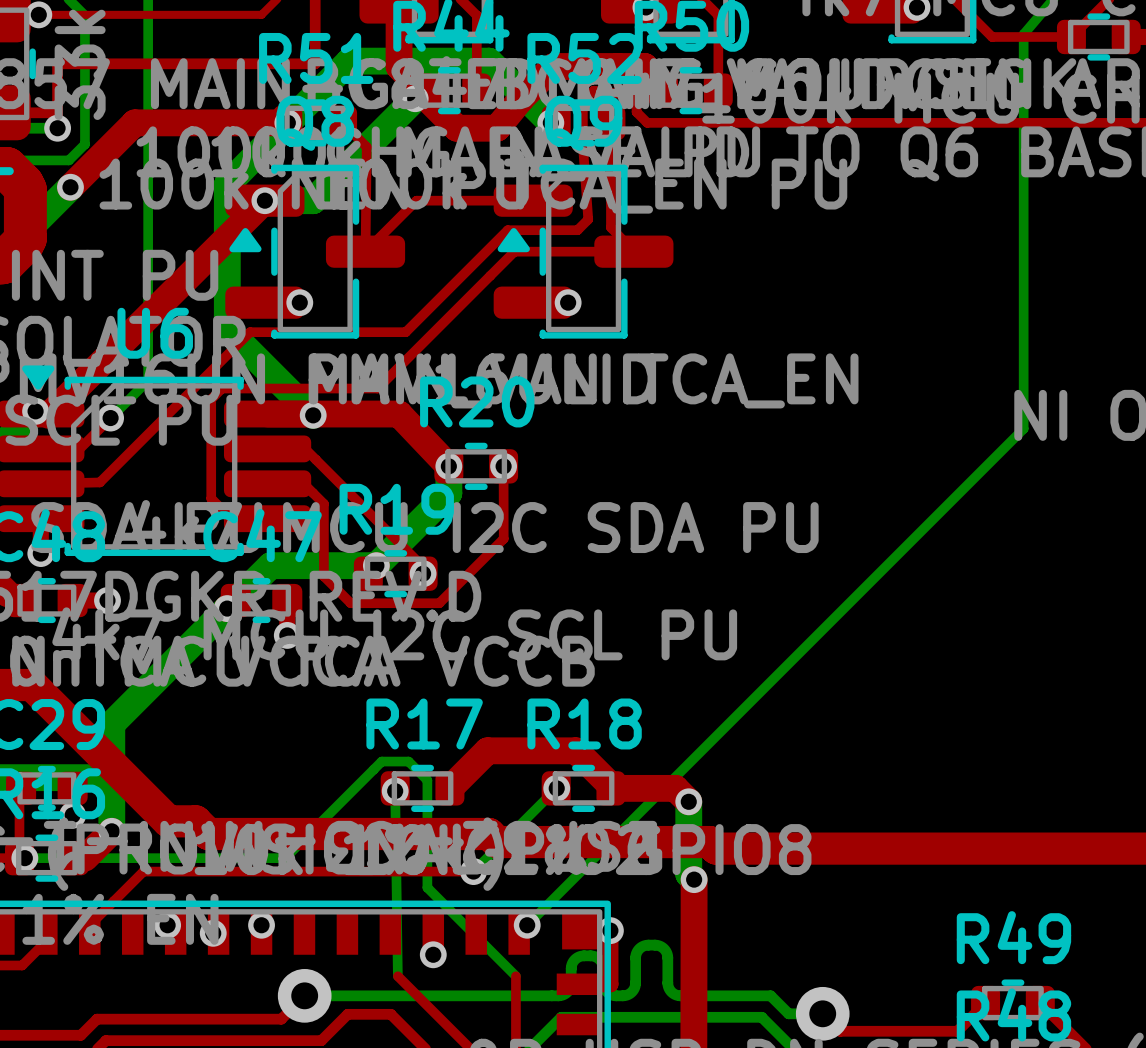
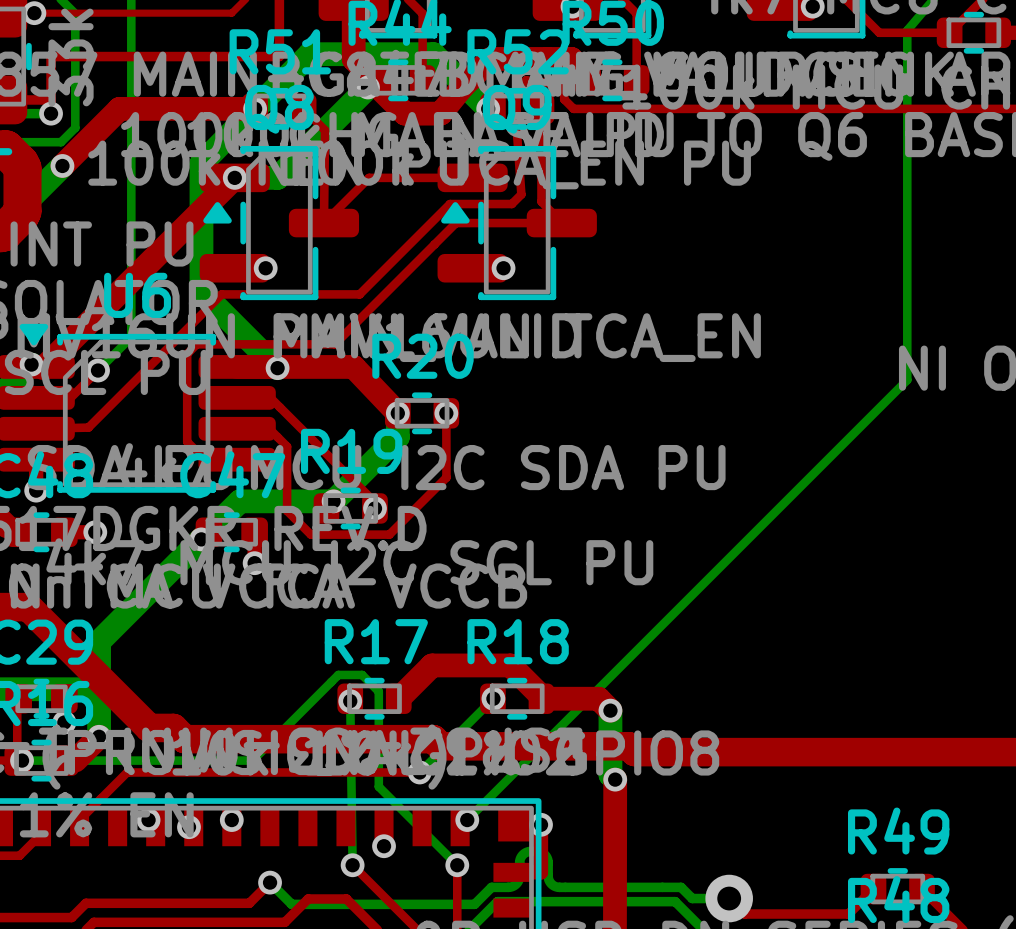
via size: [277, 969, 332, 1023] -> [258, 870, 282, 895]
via: none -> (352, 865)
via: none -> (457, 865)
bottom track: (304, 995) (559, 995) (566, 993) (570, 987) (573, 961) (577, 957) (584, 955) (594, 956) (601, 961) (603, 985) (607, 992) (613, 995) (624, 995) (630, 993) (634, 987) (637, 951) (644, 945) (654, 945) (661, 947) (667, 953) (668, 985) (675, 994) (770, 995) (788, 1013) -> (270, 882) (291, 904) (474, 904) (491, 887) (509, 887) (515, 884) (519, 878) (521, 856) (527, 852) (536, 851) (542, 853) (547, 857) (548, 879) (555, 886) (681, 887) (692, 898) (699, 898)

